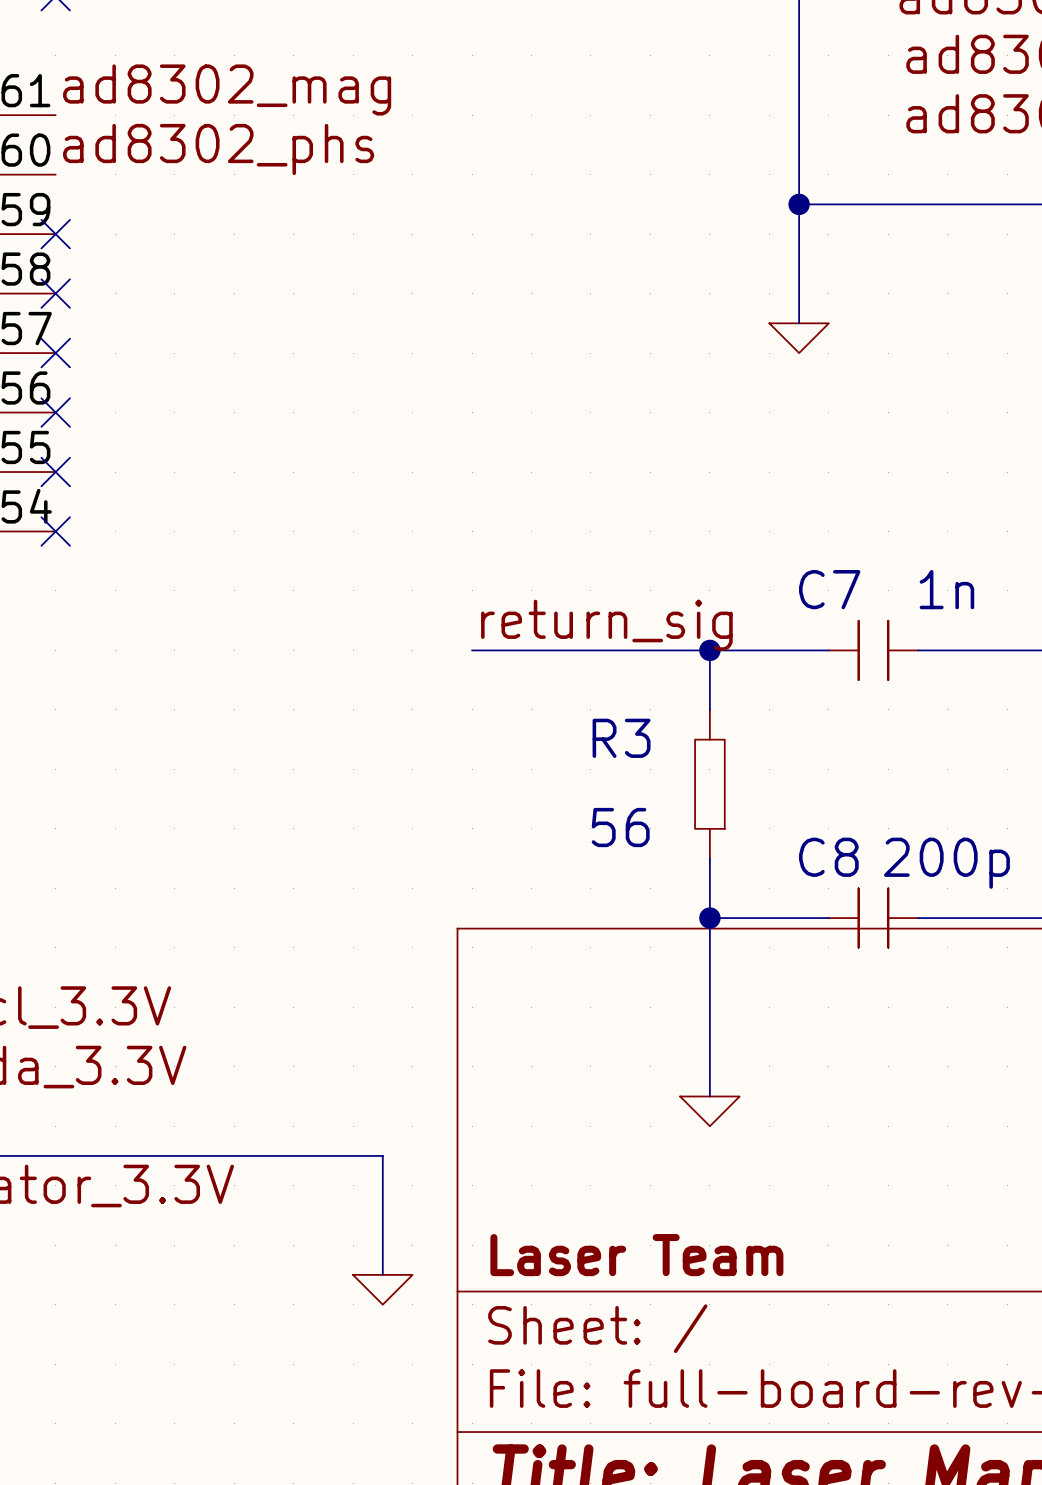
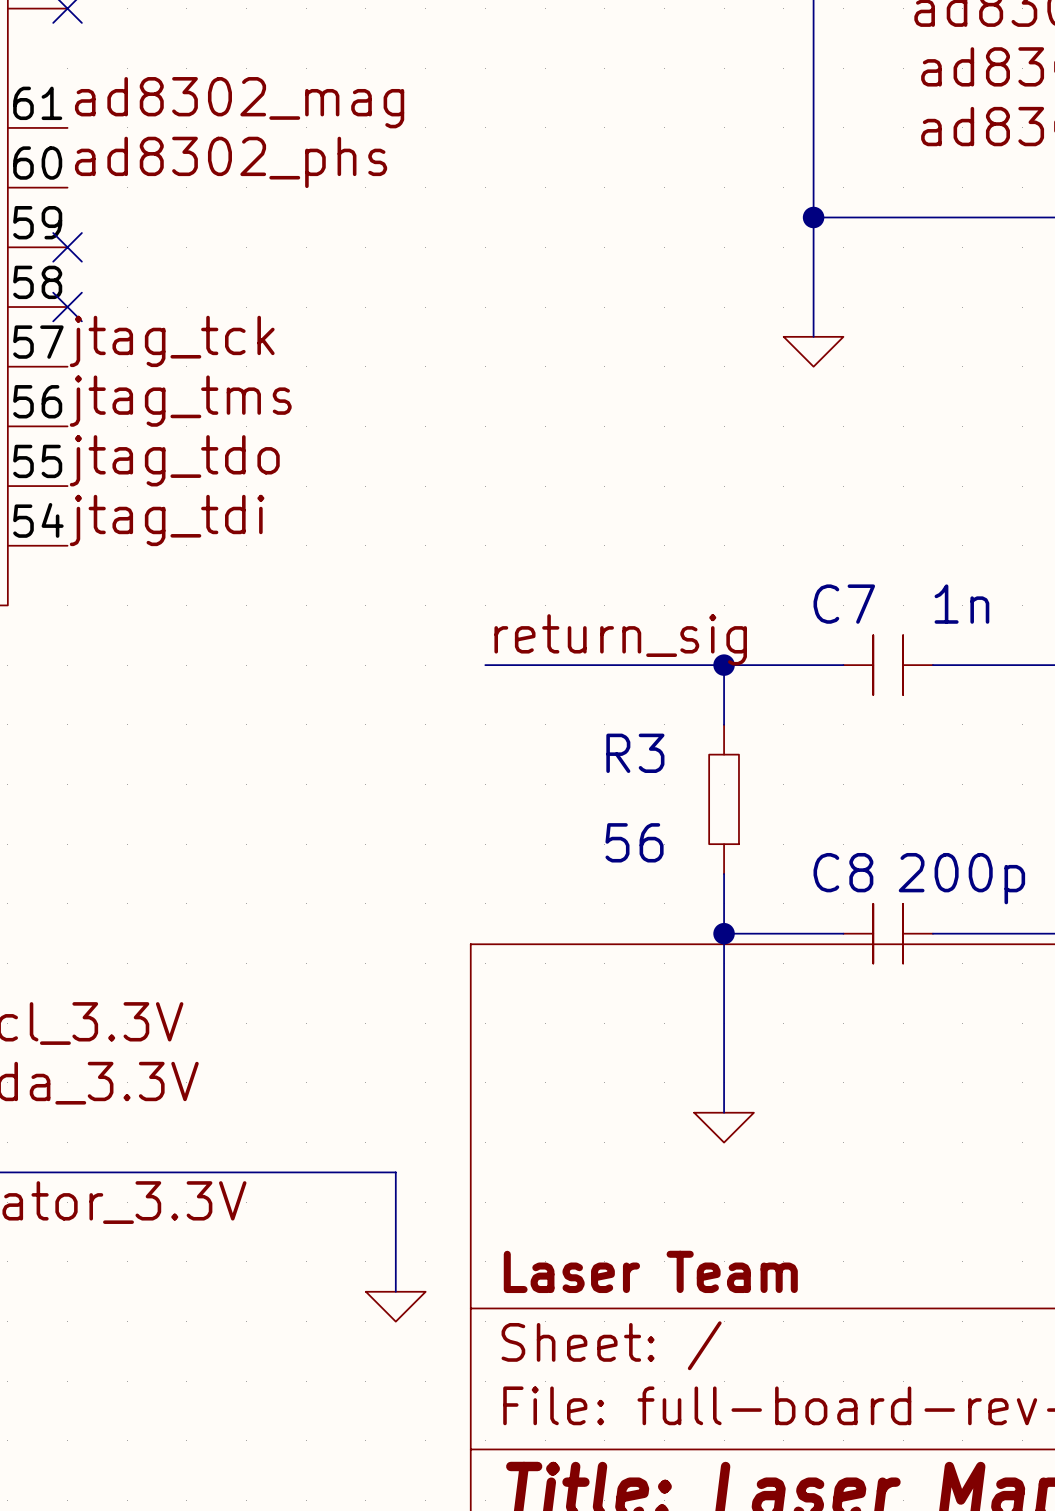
label: none -> jtag_tck (172, 341)
no-connect mark: (55, 353) -> none
label: none -> jtag_tms (180, 401)
no-connect mark: (55, 412) -> none
label: none -> jtag_tdo (174, 460)
no-connect mark: (55, 472) -> none
label: none -> jtag_tdi (167, 520)
no-connect mark: (55, 531) -> none

